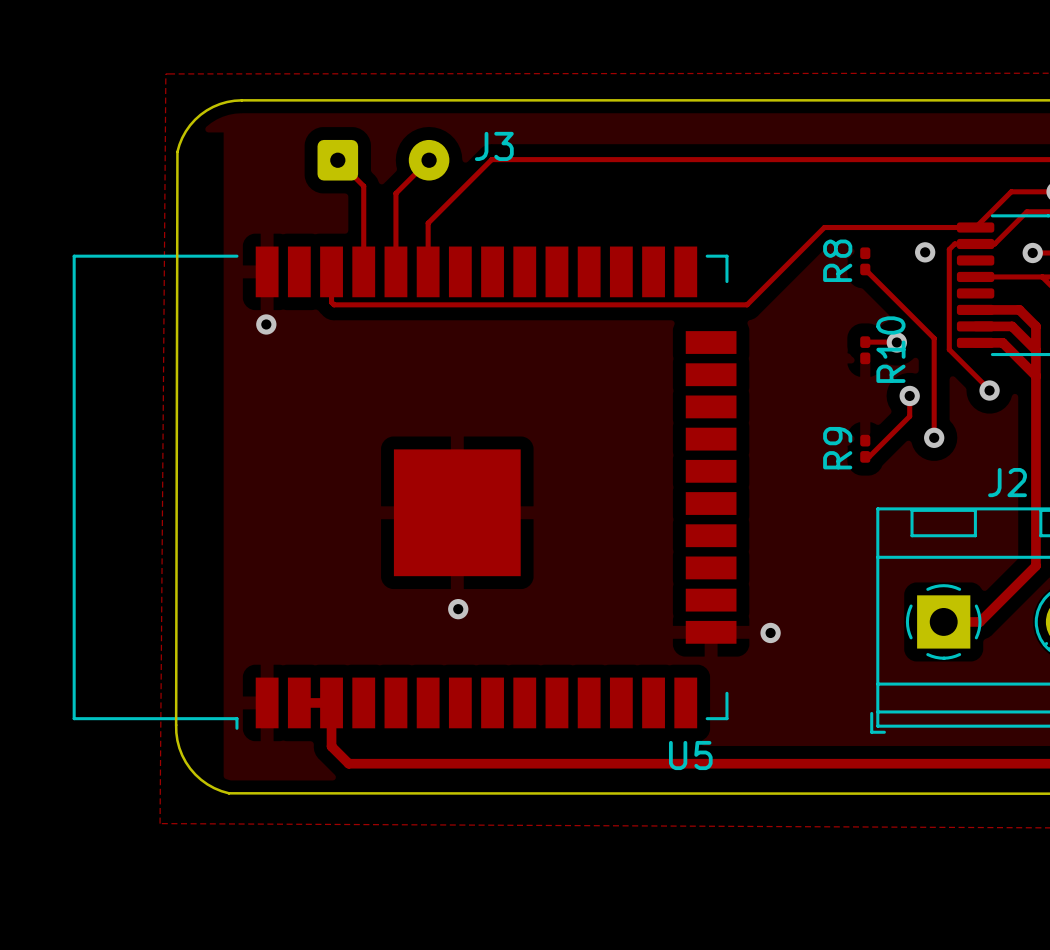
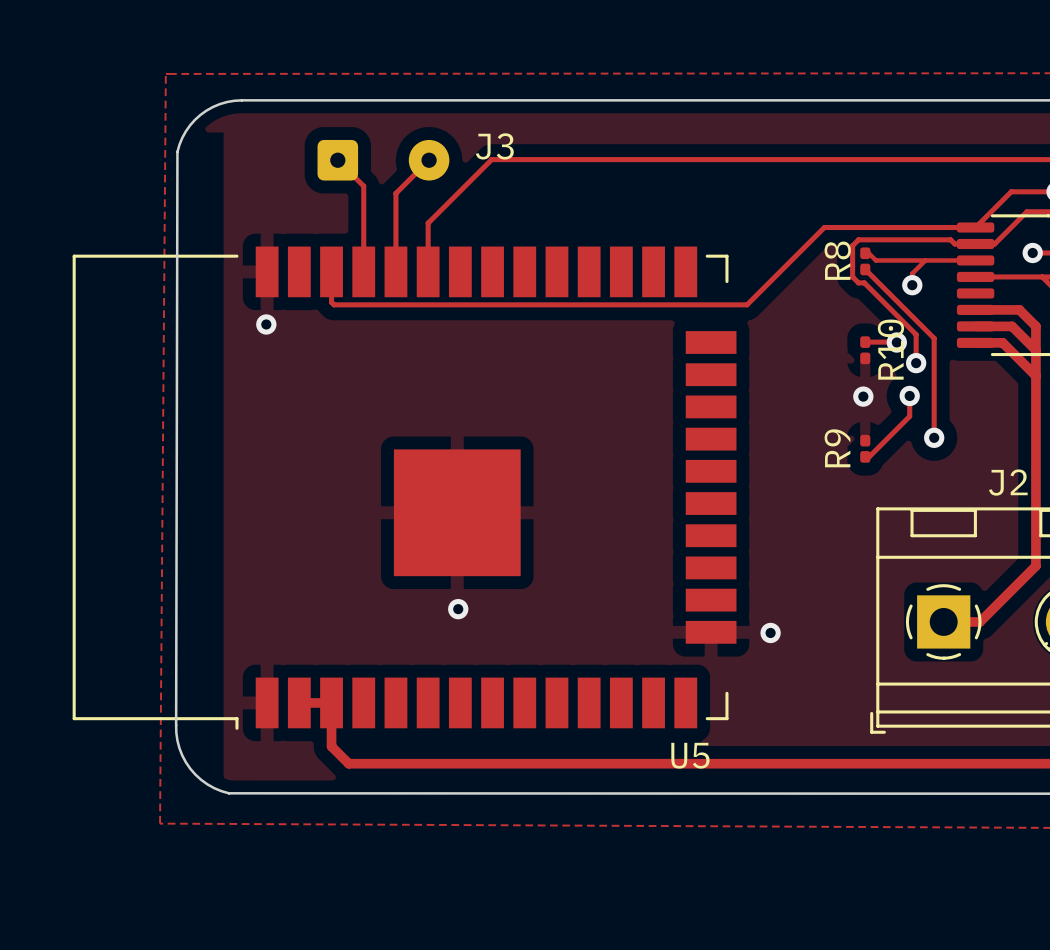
track: (954, 243) (949, 249) (949, 349) (989, 390) -> (954, 243) (950, 239) (858, 239) (852, 245) (852, 276) (858, 282) (864, 282) (916, 334) (916, 363)
via position: (925, 252) -> (912, 285)
track: none -> (865, 253) (868, 253) (876, 260) (975, 260)
track: none -> (925, 260) (912, 273) (912, 285)
via: none -> (916, 363)
via: (989, 390) -> none
via: none -> (863, 396)

